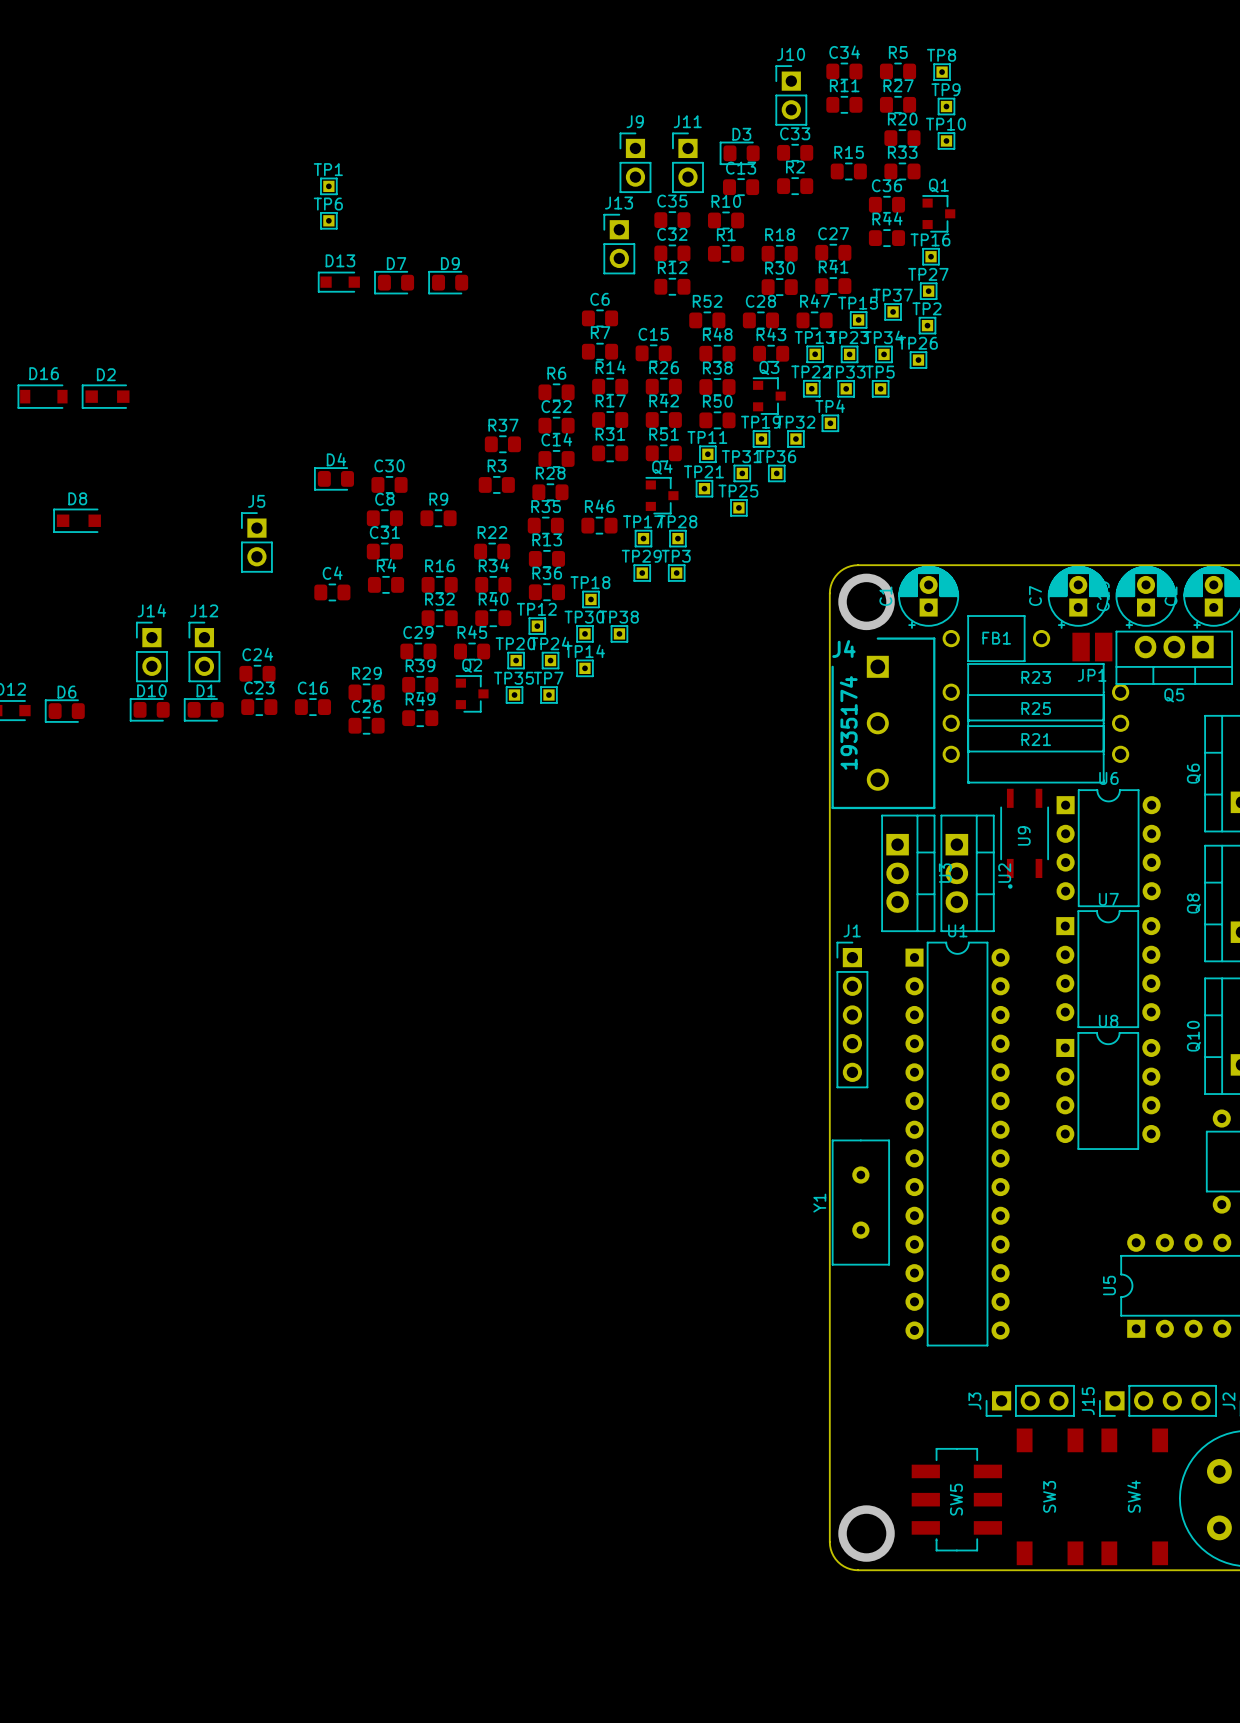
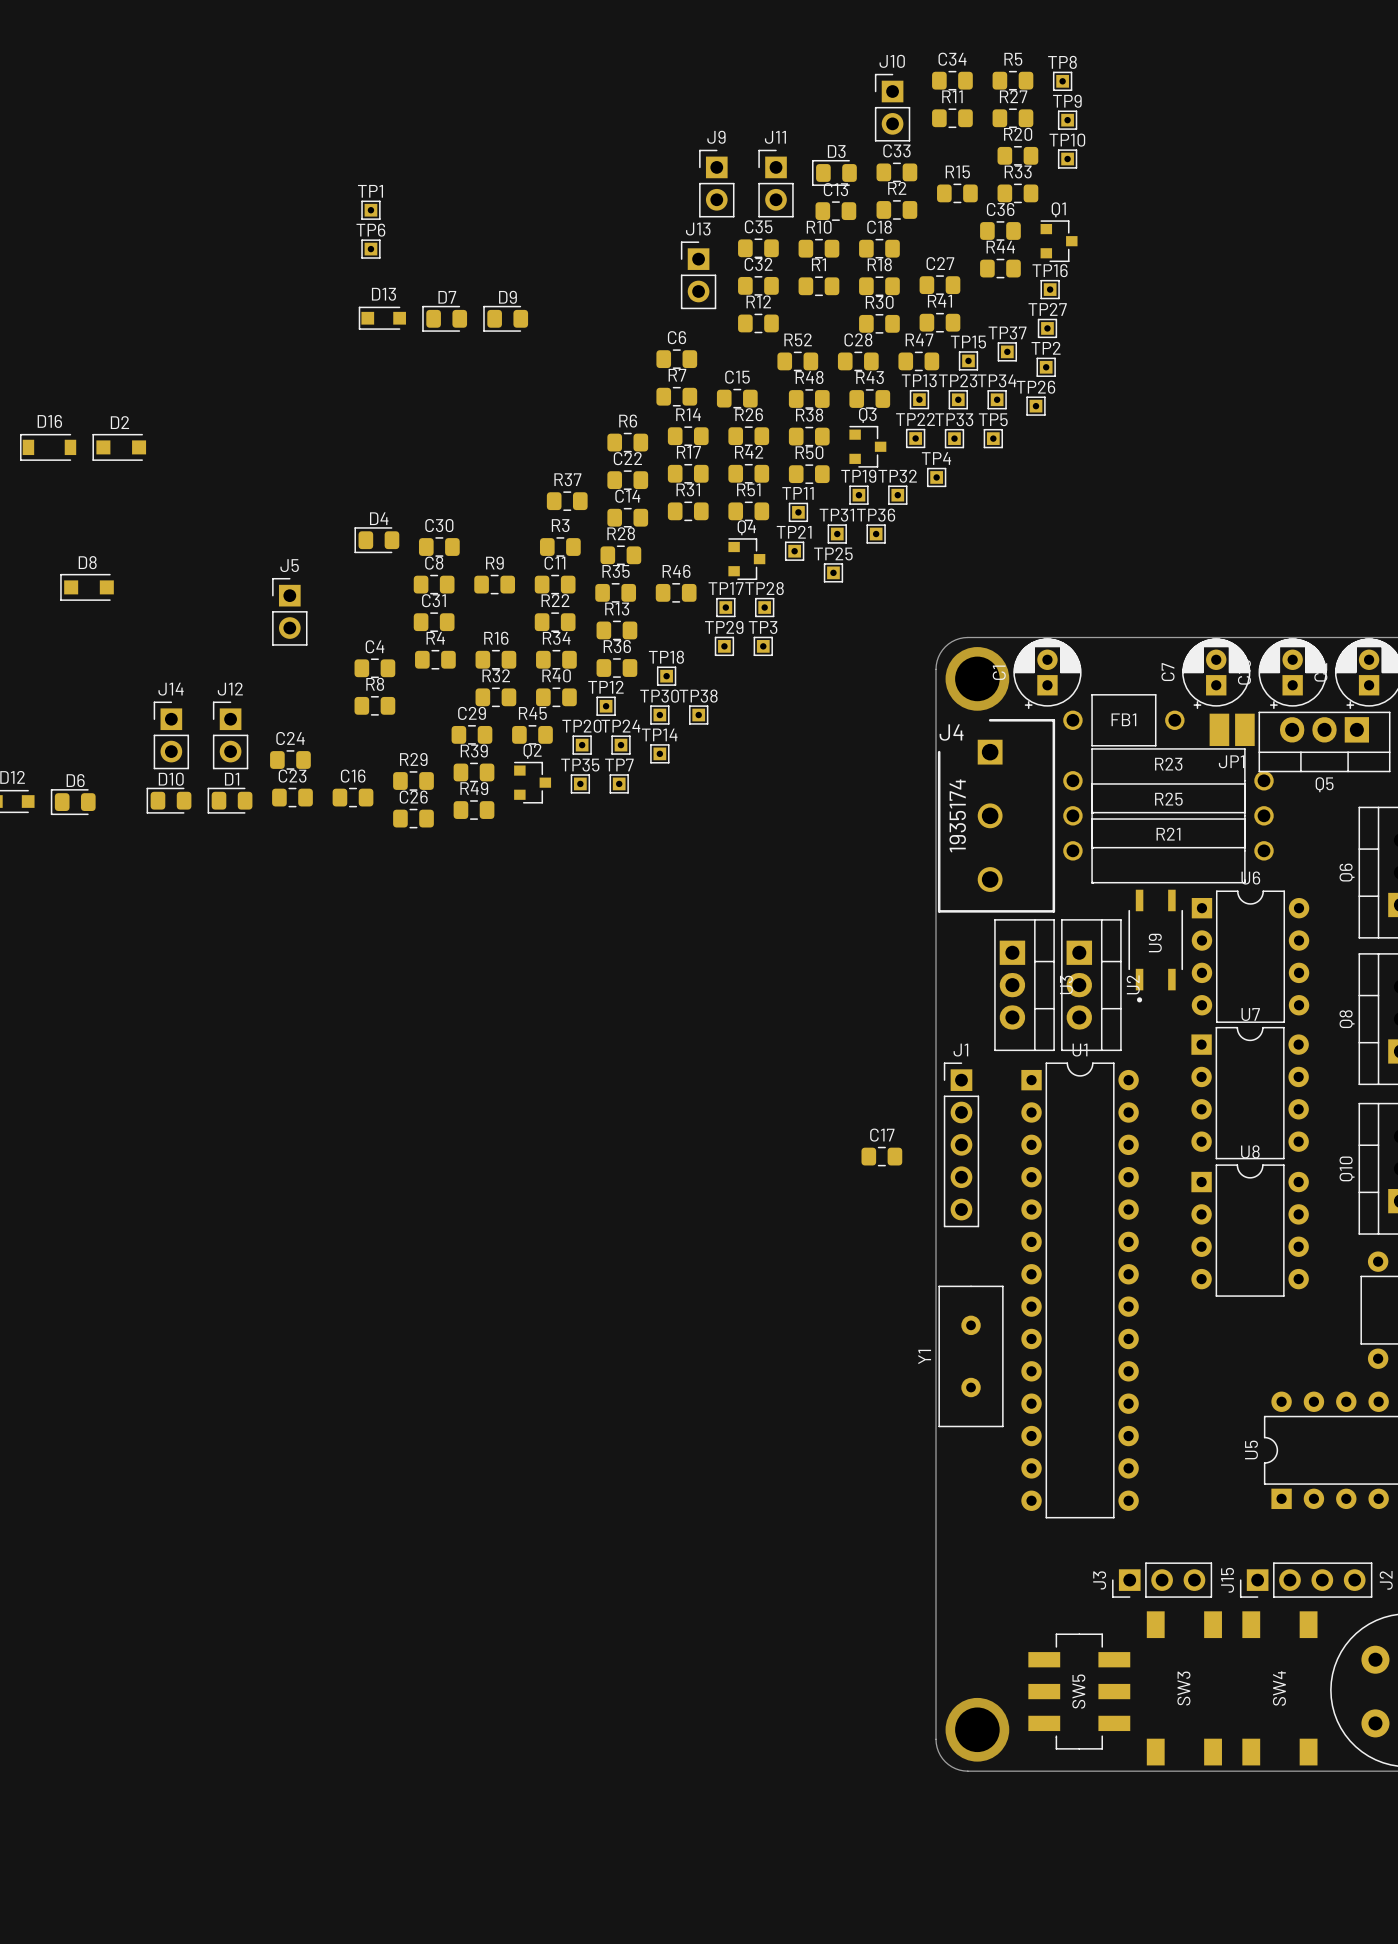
C18: none -> (879, 248)
C11: none -> (555, 584)
R8: none -> (374, 705)
C17: none -> (881, 1156)

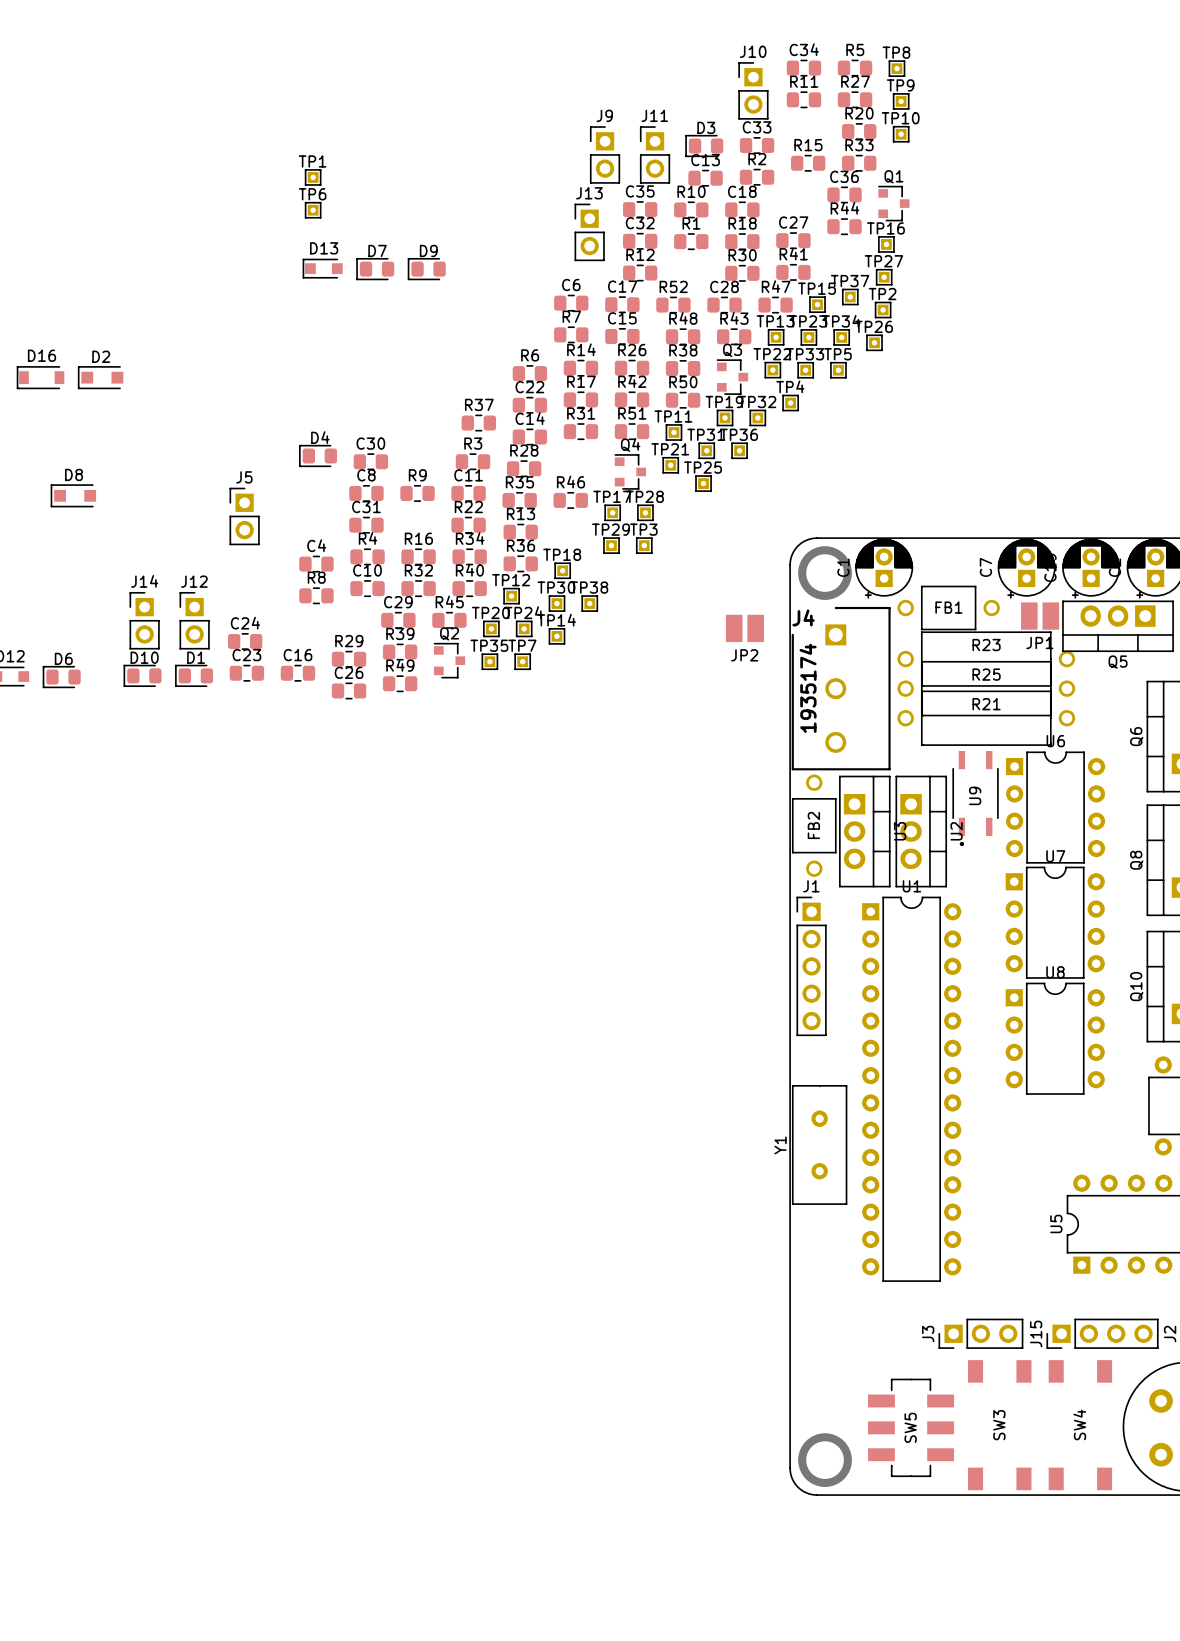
C10: none -> (367, 588)
JP2: none -> (744, 628)
FB2: none -> (814, 825)
C17 position: (881, 1156) -> (622, 304)

